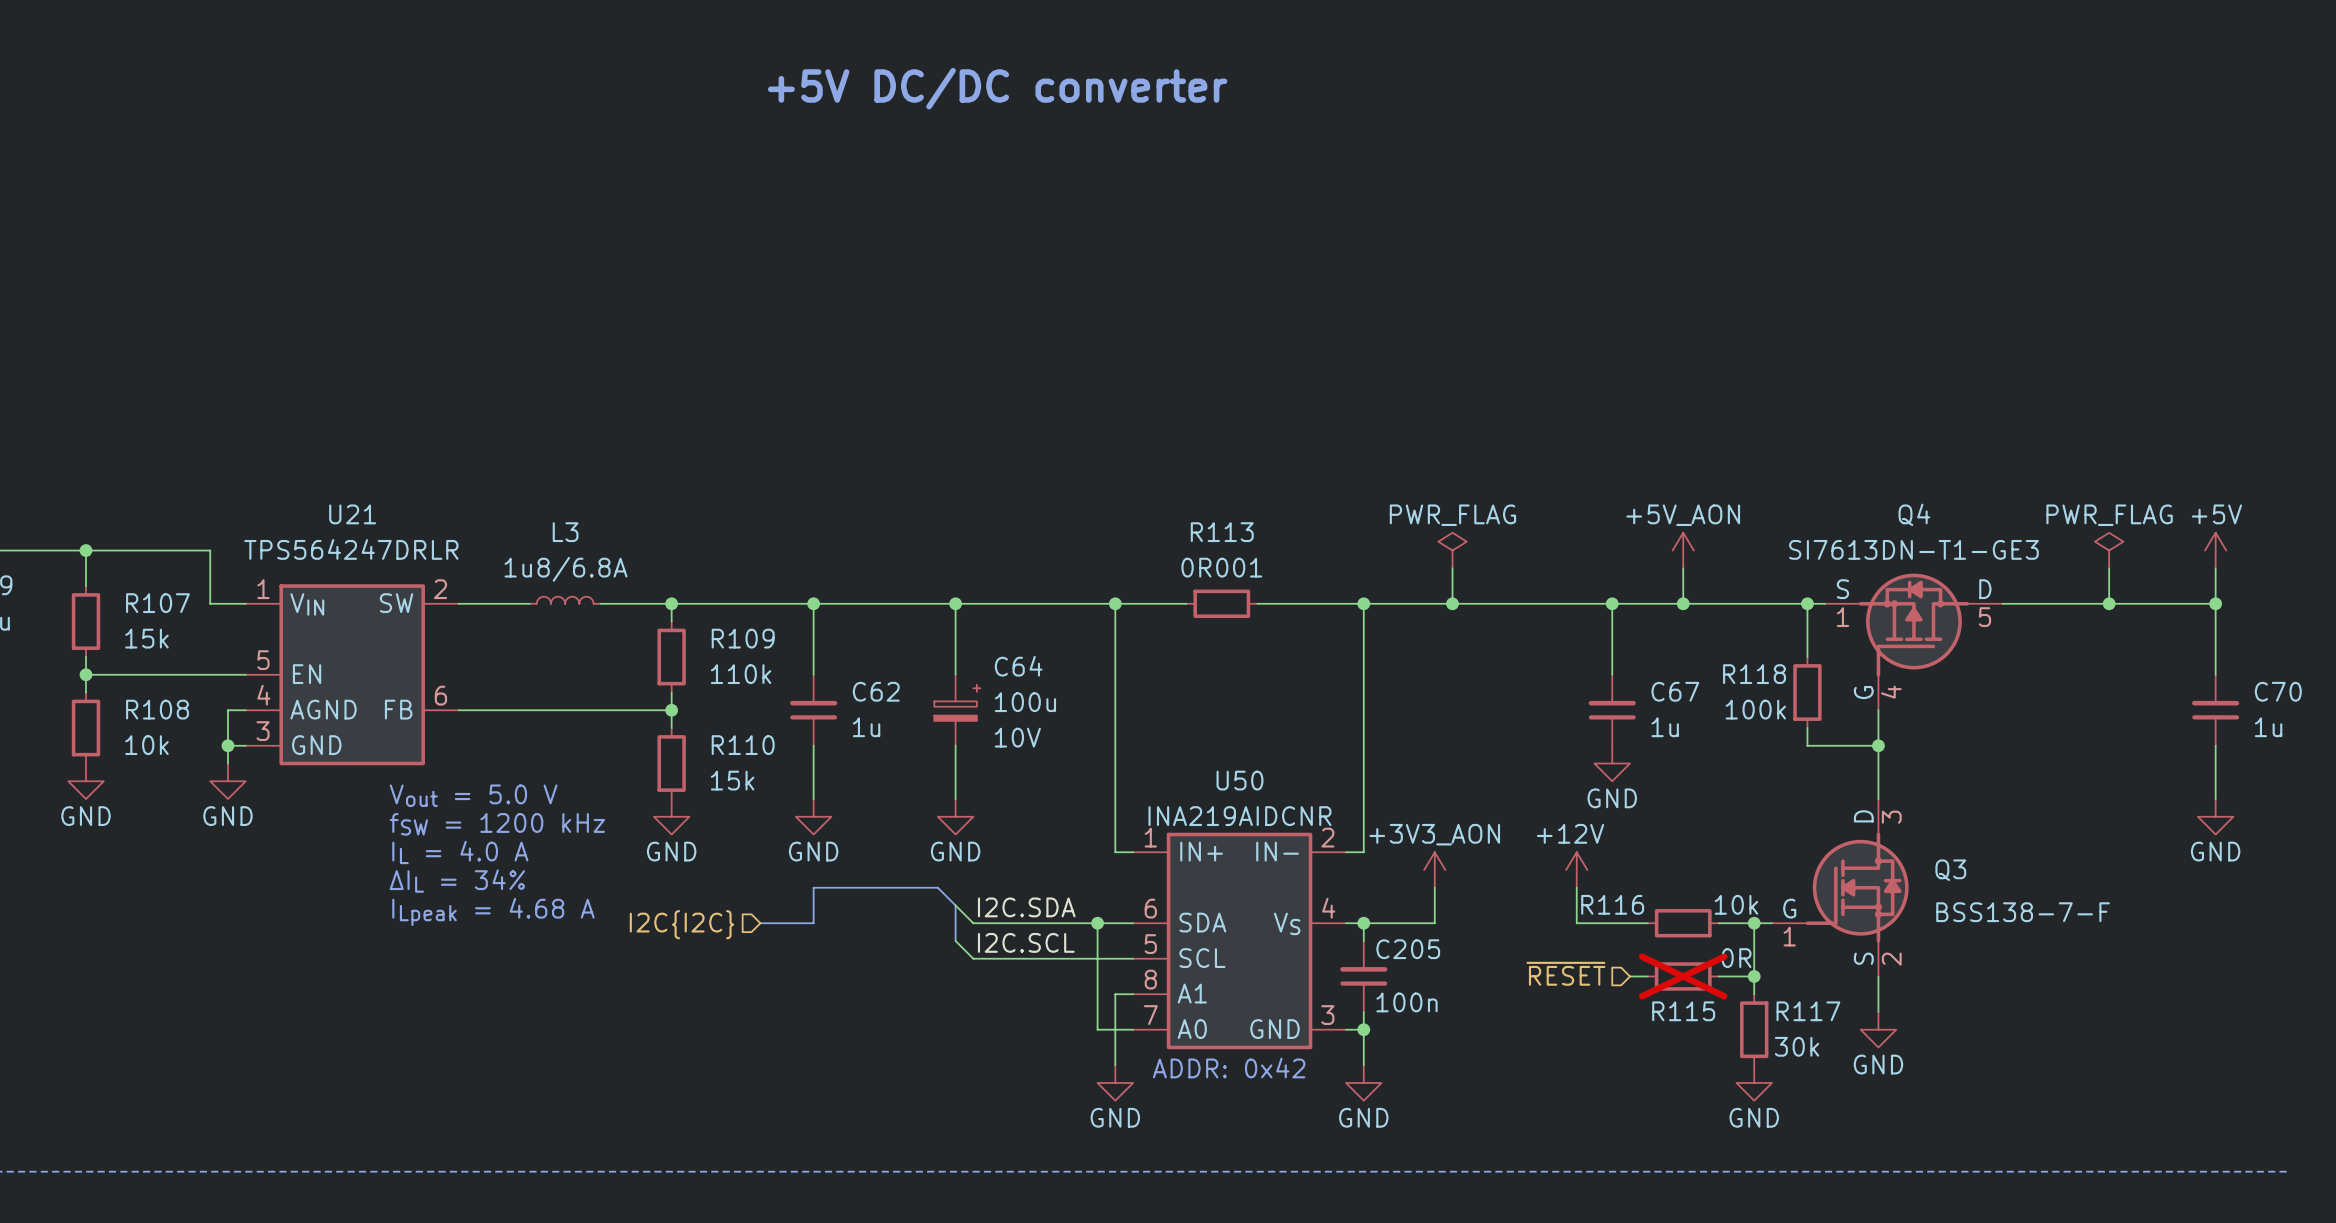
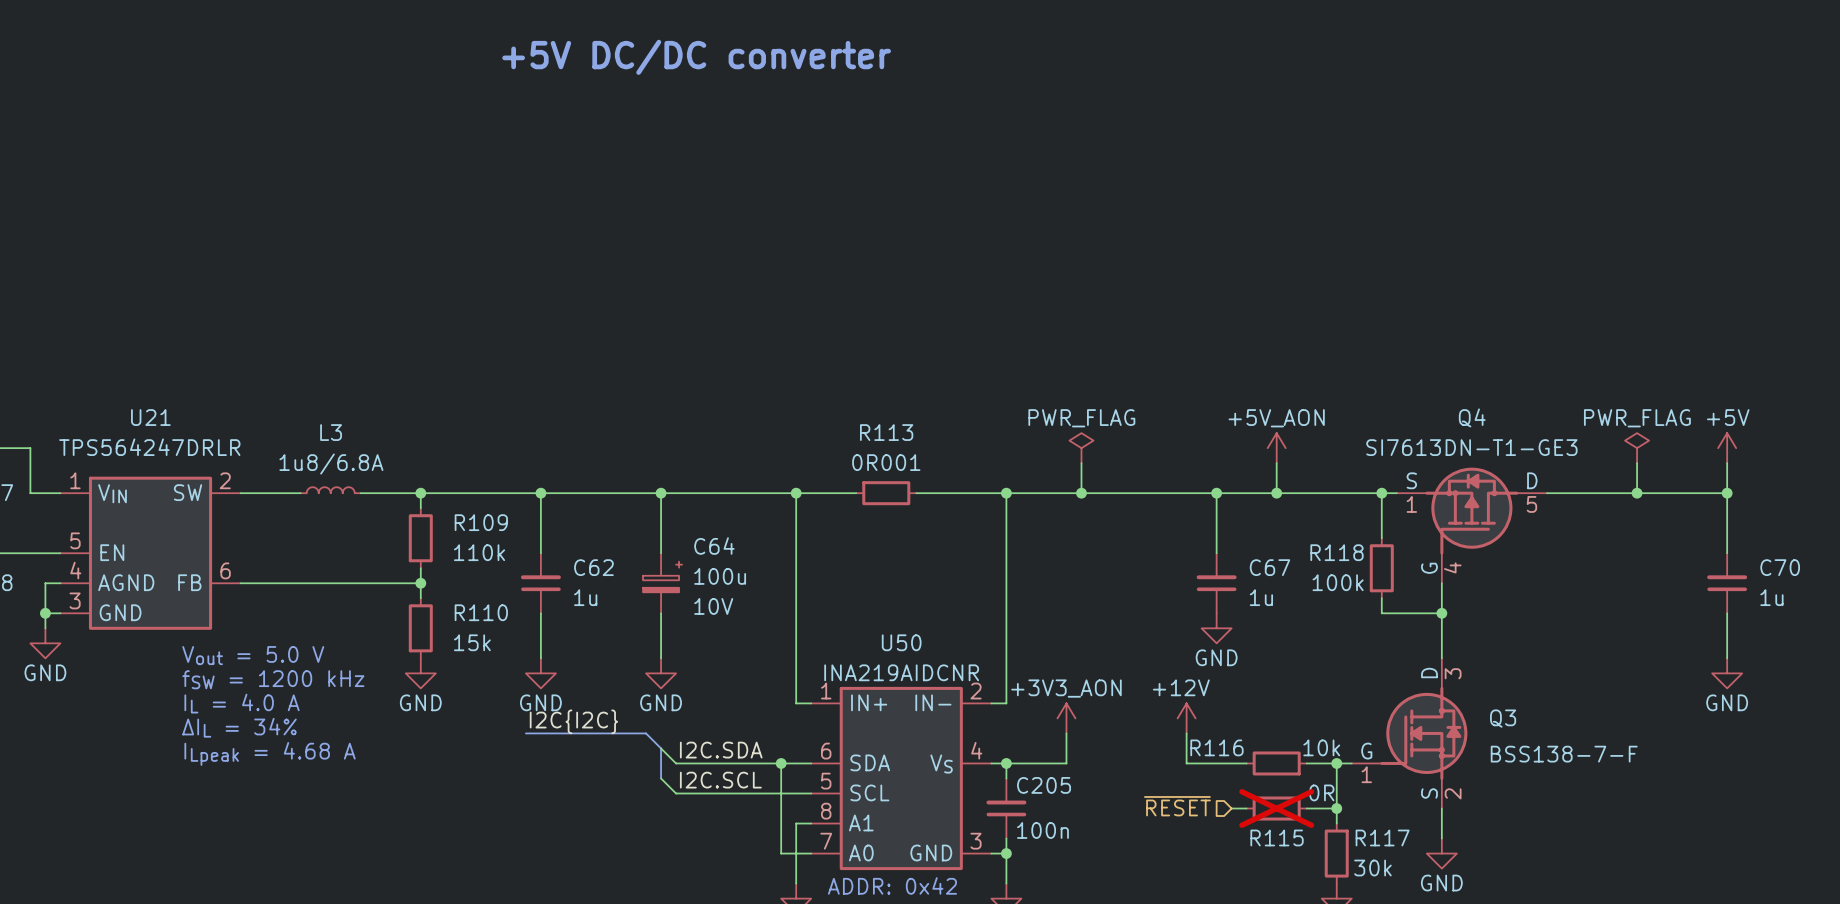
label: none -> I2C{I2C} (573, 721)
bus: (813, 887) (813, 923) (760, 923) -> (540, 733) (525, 733)
hierarchical label: I2C{I2C} (681, 924) -> none

